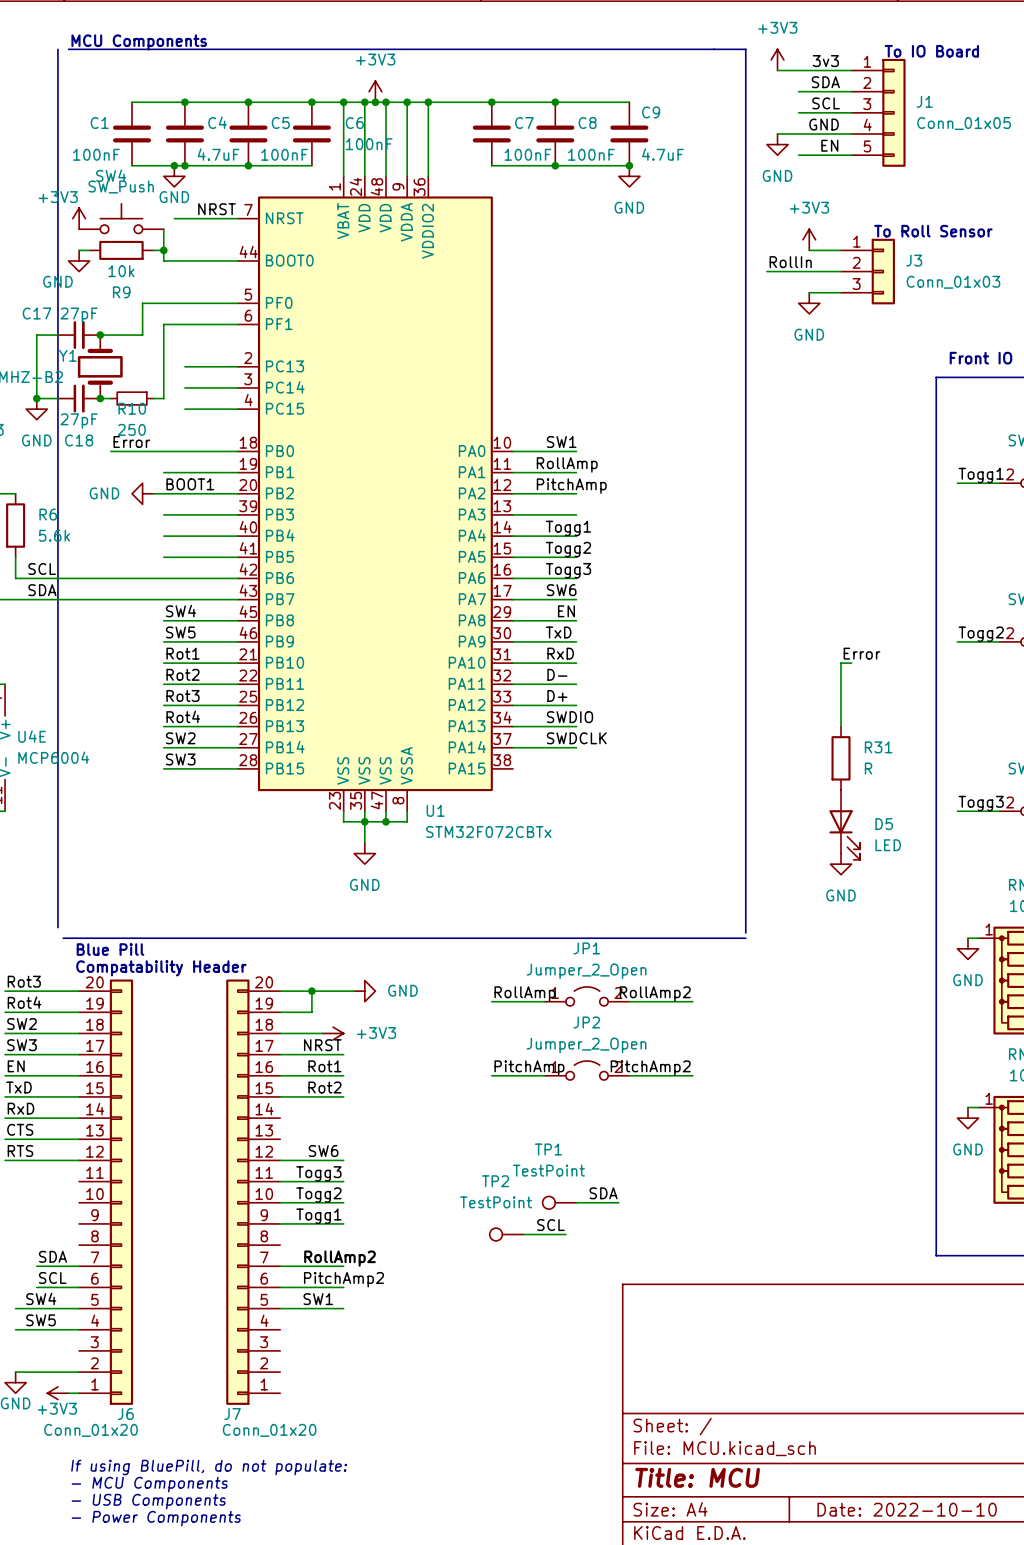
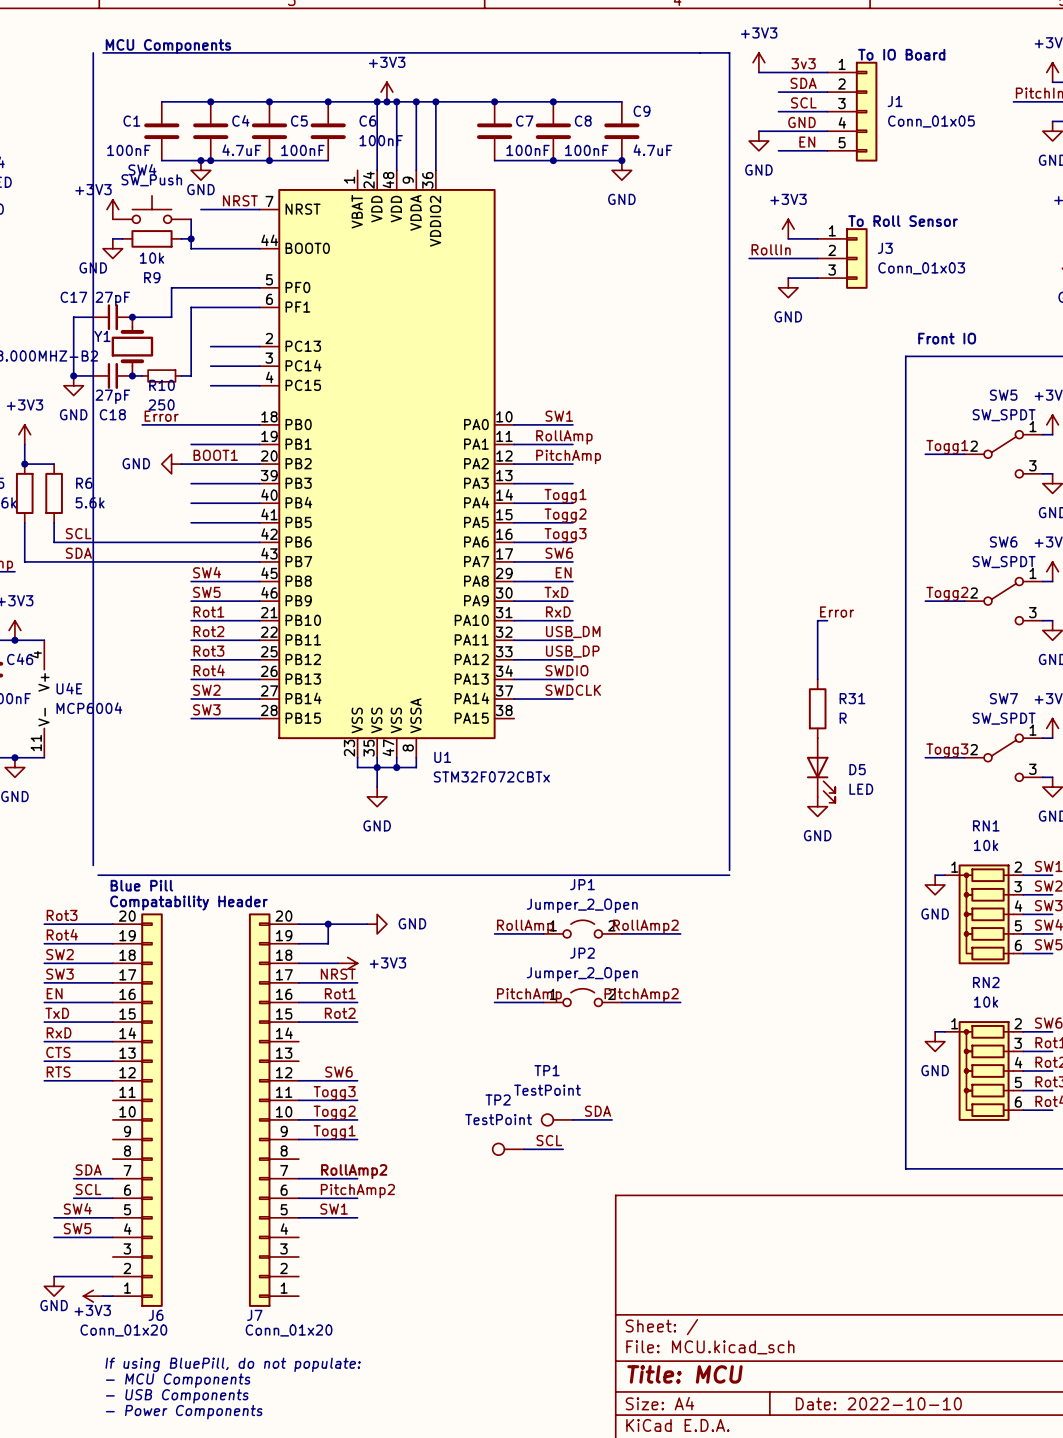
wire: (343, 102) (343, 176) -> none
junction: (343, 102) -> none
label: D- (557, 674) -> USB_DM (573, 632)
label: D+ (557, 695) -> USB_DP (572, 651)

